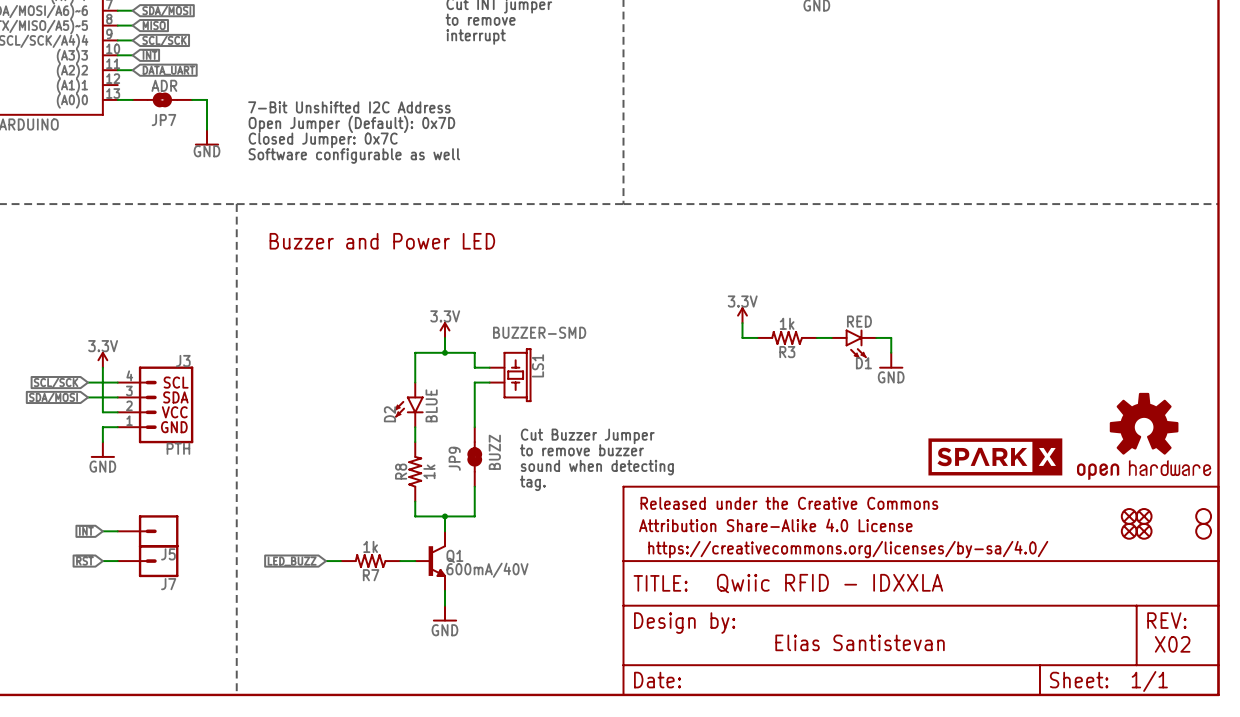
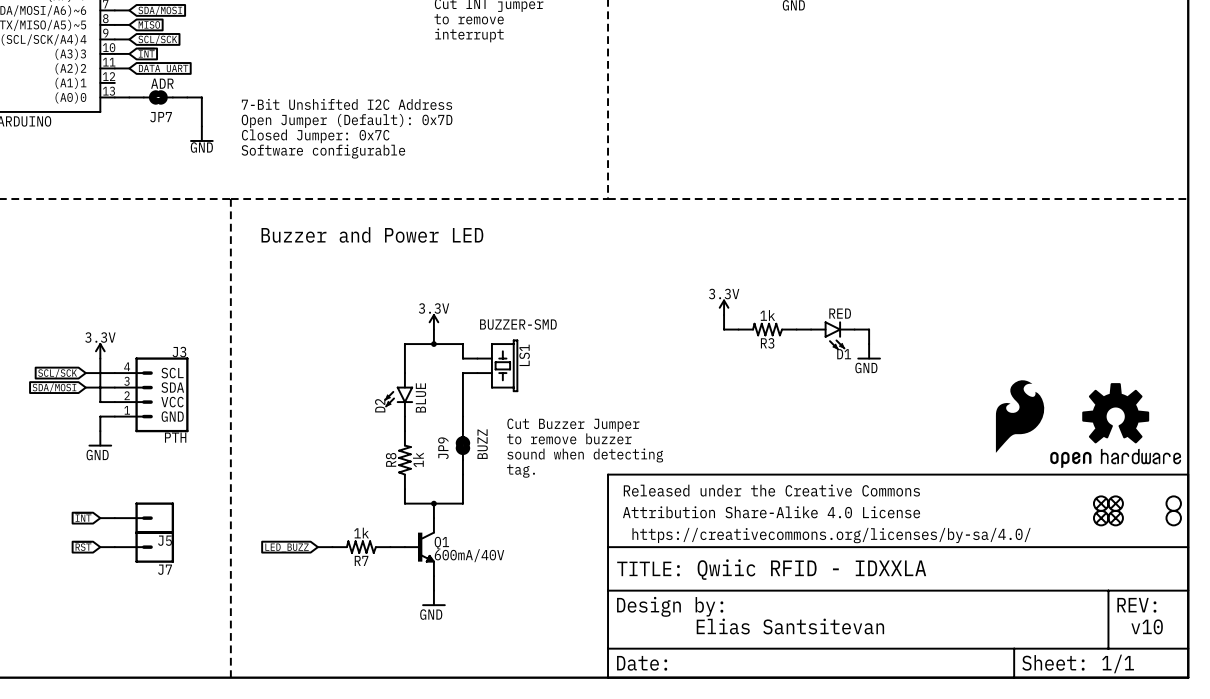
text: Software configurable as well (354, 155) -> Software configurable (323, 151)
part: none -> (1020, 416)
part: (995, 456) -> none
text: Elias Santistevan (860, 642) -> Elias Santsitevan (790, 626)
text: none -> v10 (1147, 626)
text: X02 (1172, 644) -> none

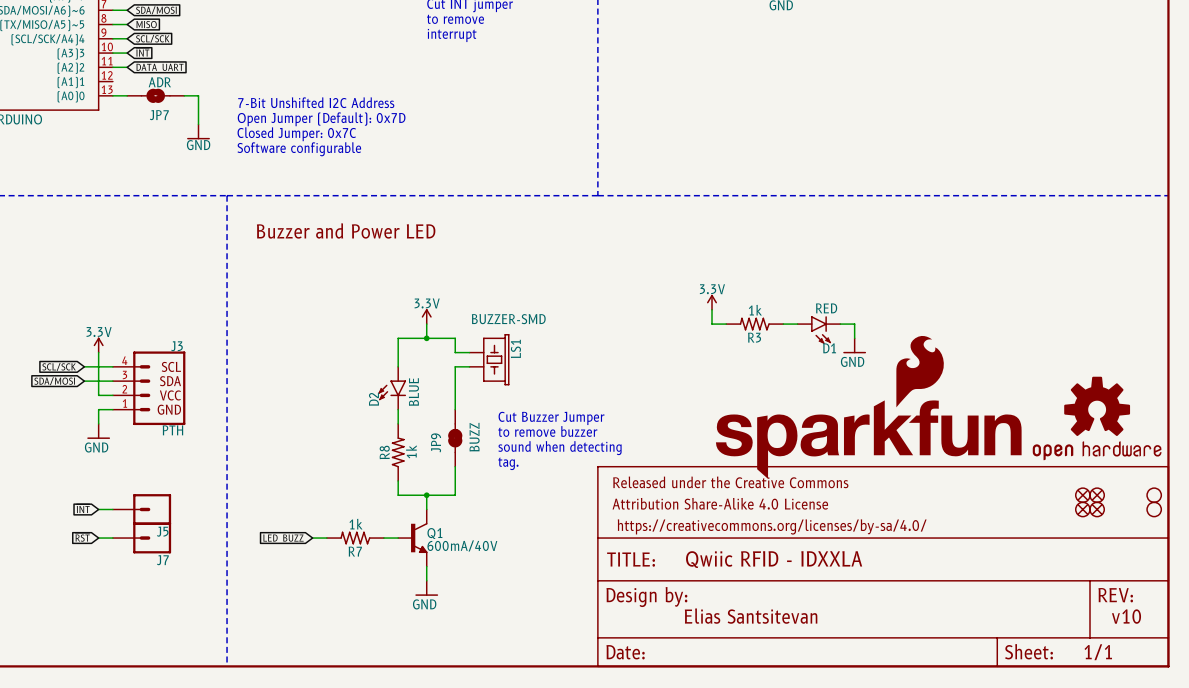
part: none -> (868, 407)
part: (1020, 416) -> none

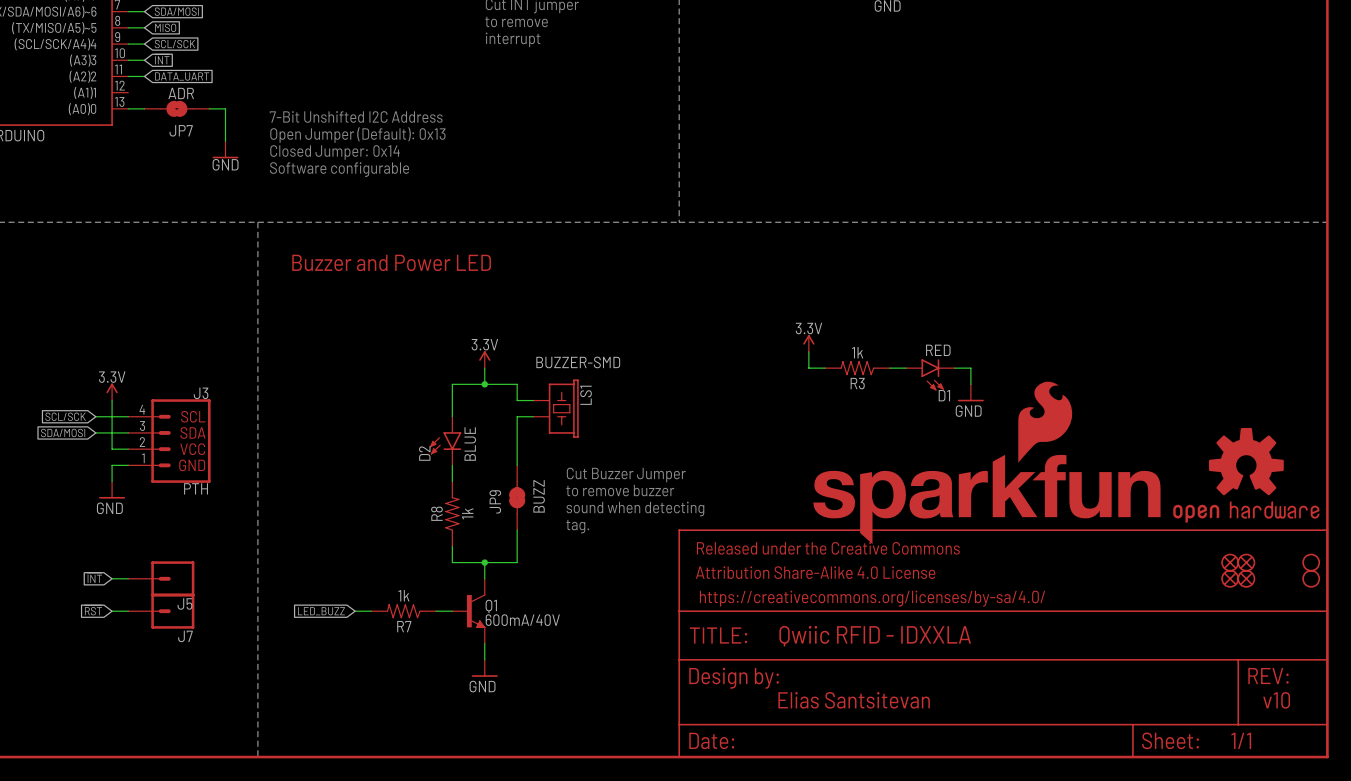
text: Open Jumper (Default): 0x7D (321, 119) -> Open Jumper (Default): 0x13 (357, 135)
text: Closed Jumper: 0x7C (296, 134) -> Closed Jumper: 0x14 (335, 152)

